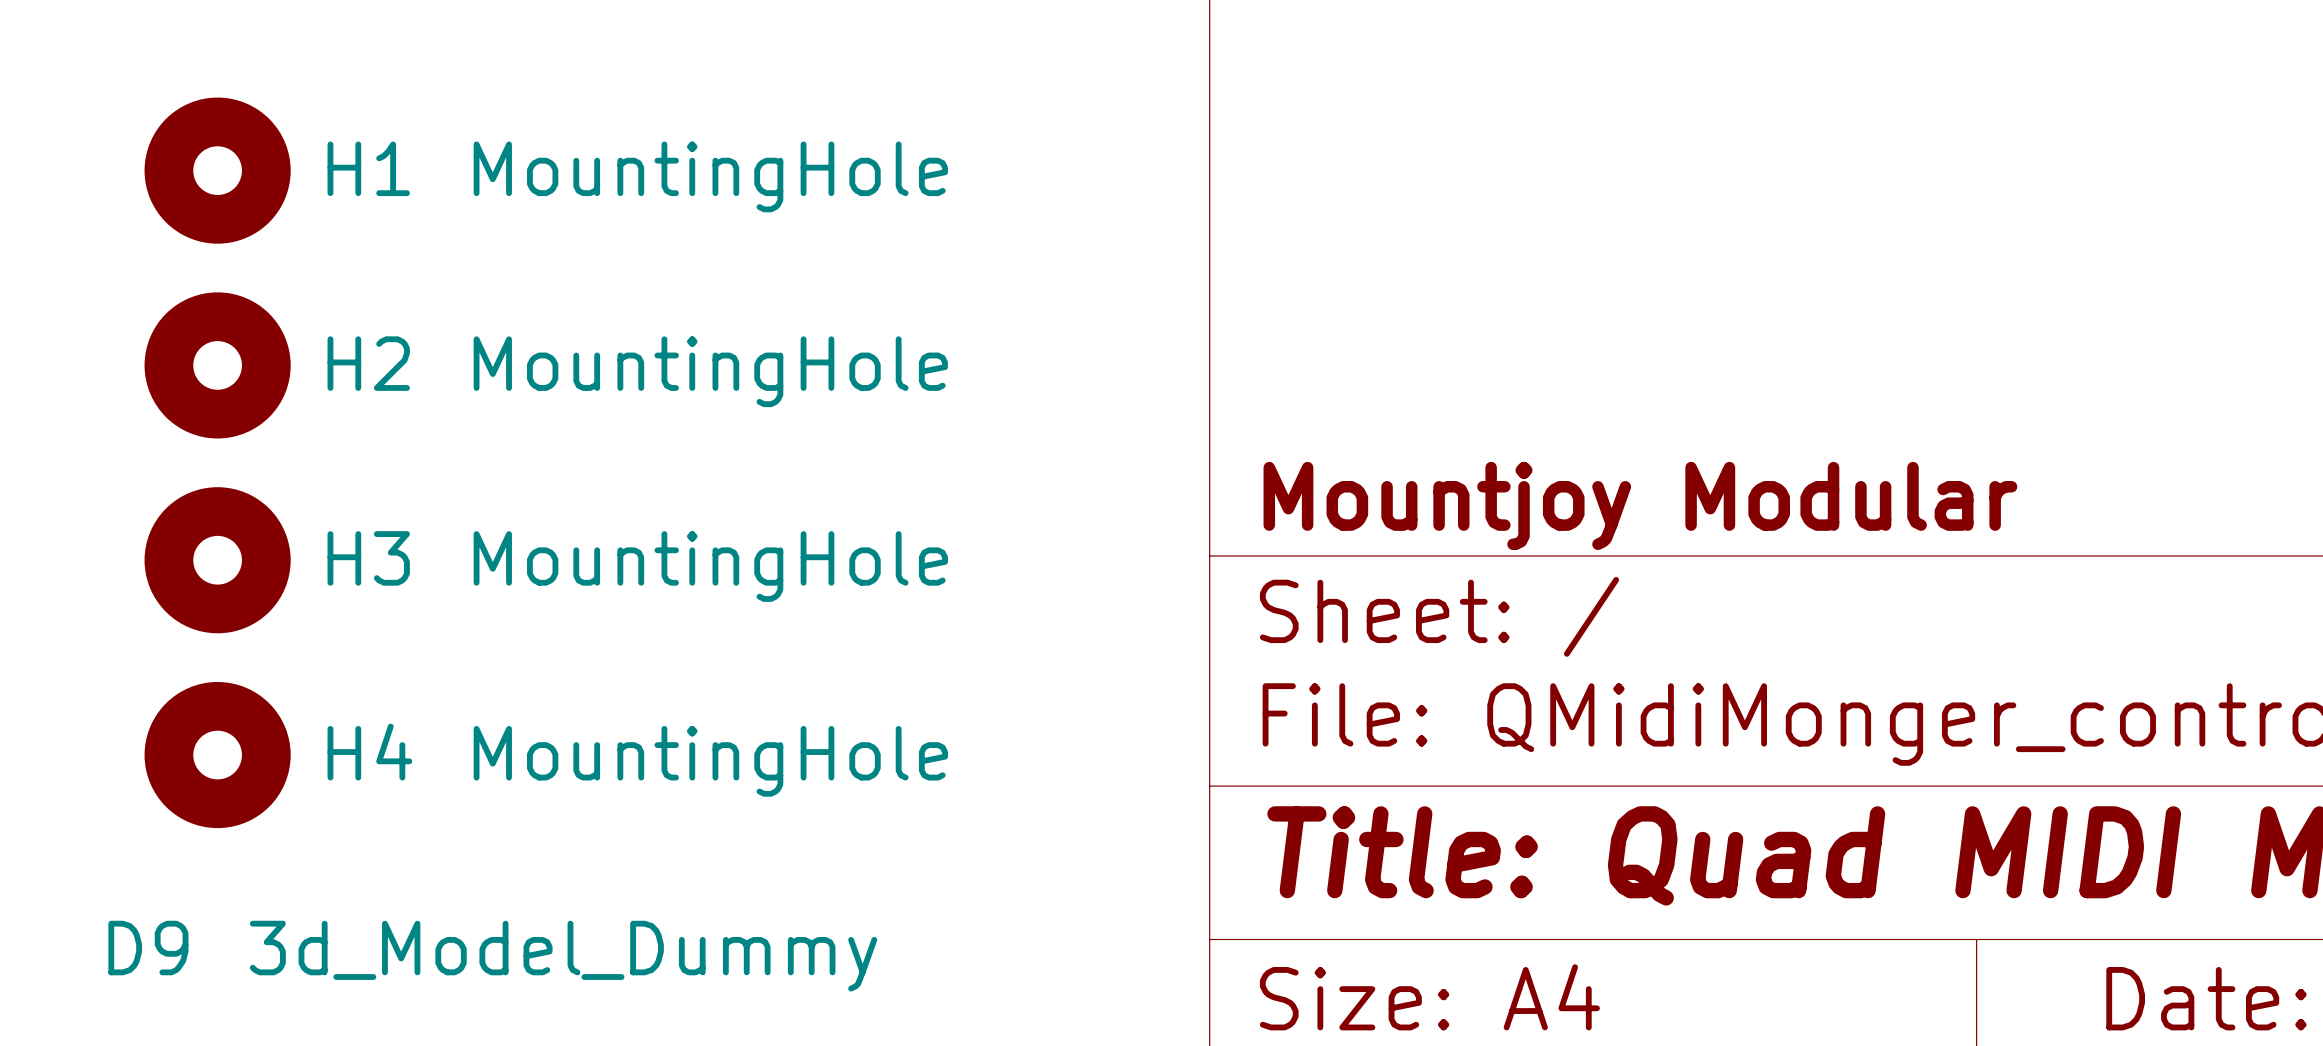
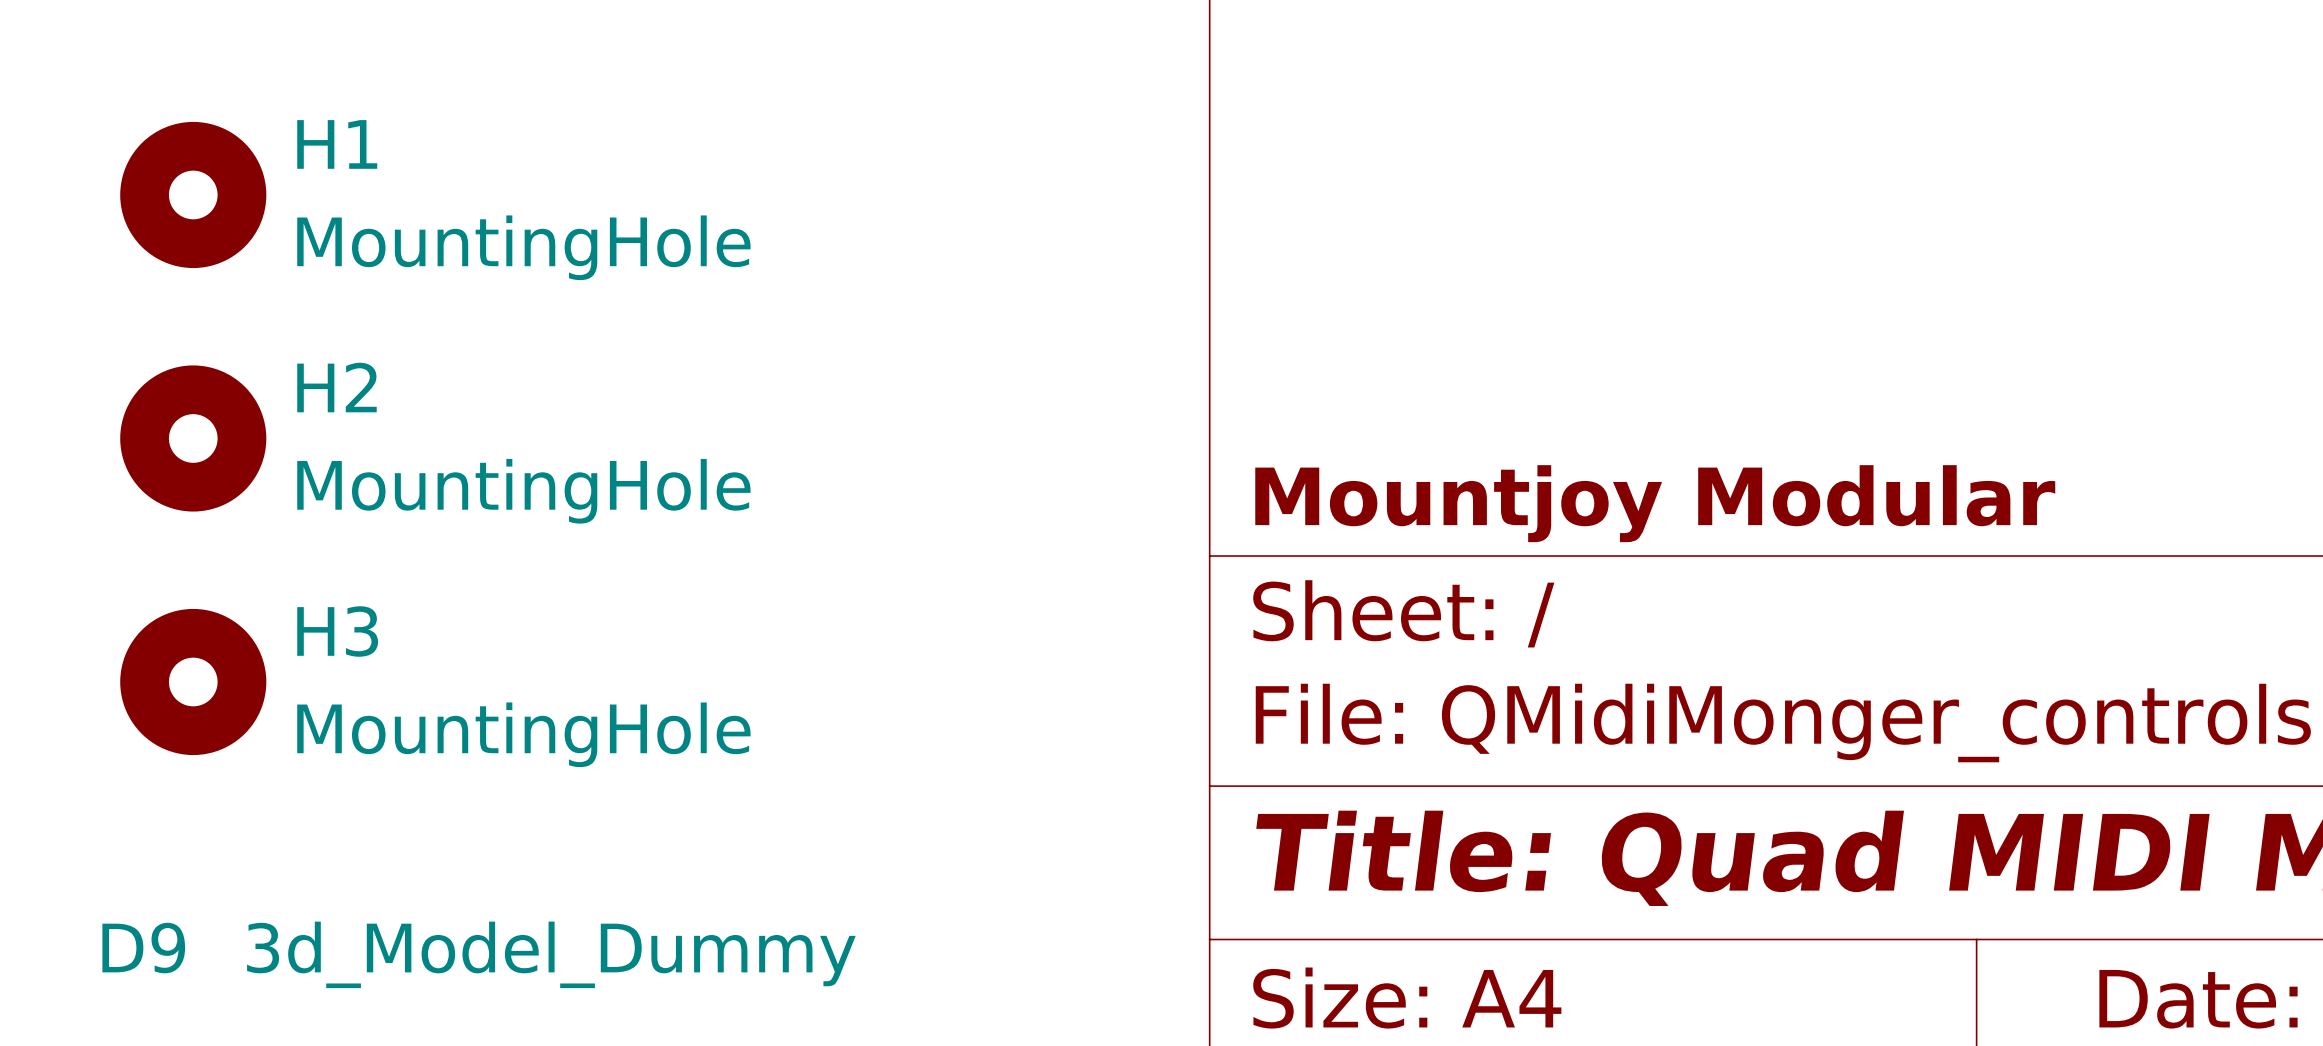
H1 name position: H1 (368, 168) -> H1 (337, 144)
H1 position: (217, 170) -> (193, 194)
H1 value position: MountingHole (710, 176) -> MountingHole (523, 247)
H2 name position: H2 (368, 363) -> H2 (336, 387)
H2 position: (217, 365) -> (193, 438)
H2 value position: MountingHole (710, 371) -> MountingHole (523, 491)
H3 name position: H3 (368, 558) -> H3 (337, 631)
H3 position: (217, 560) -> (193, 681)
H3 value position: MountingHole (710, 566) -> MountingHole (523, 734)
H4: MountingHole (217, 755) -> none

